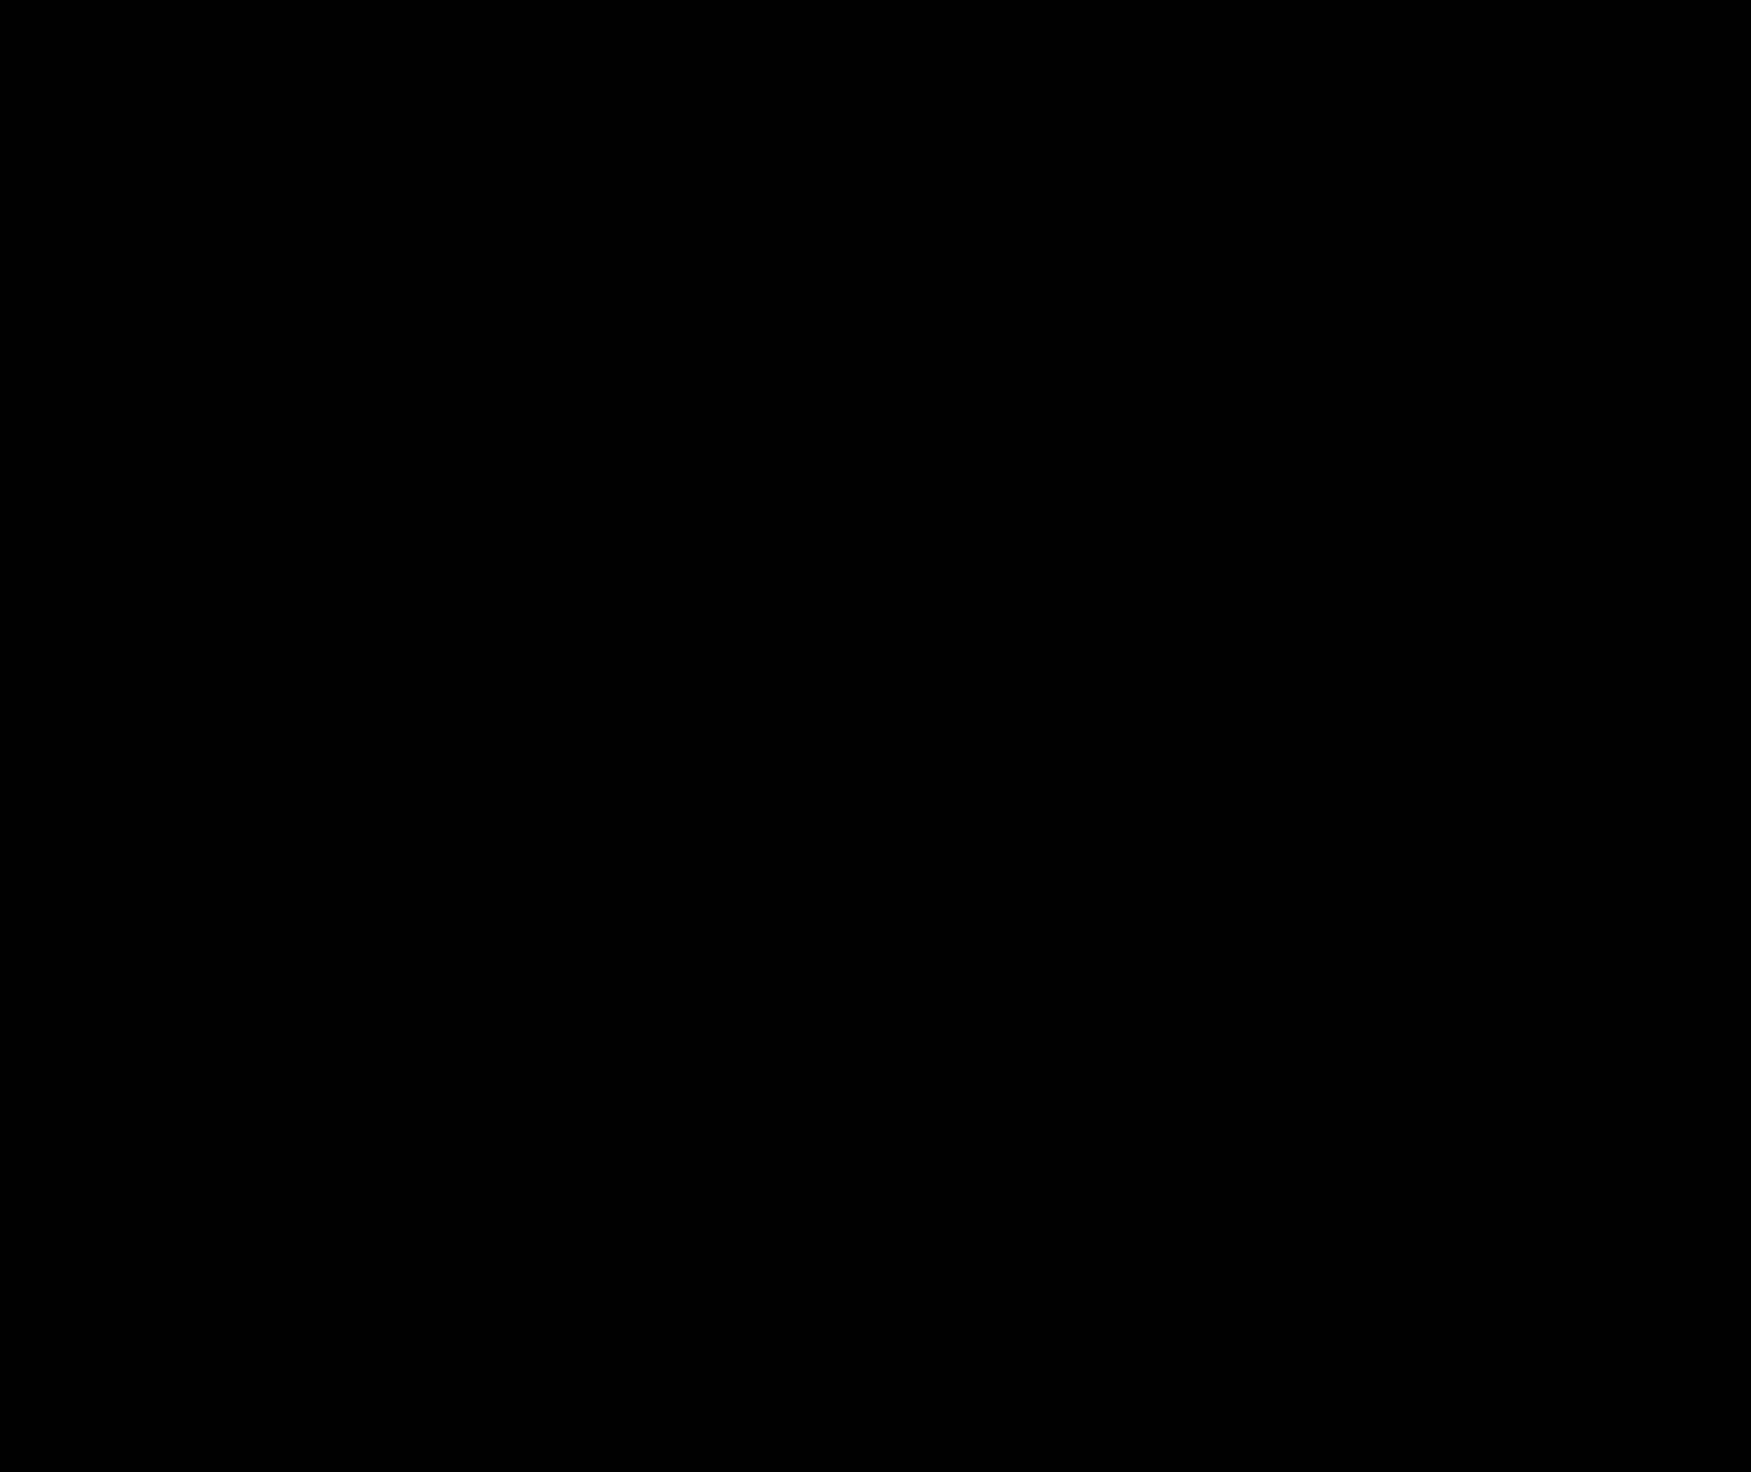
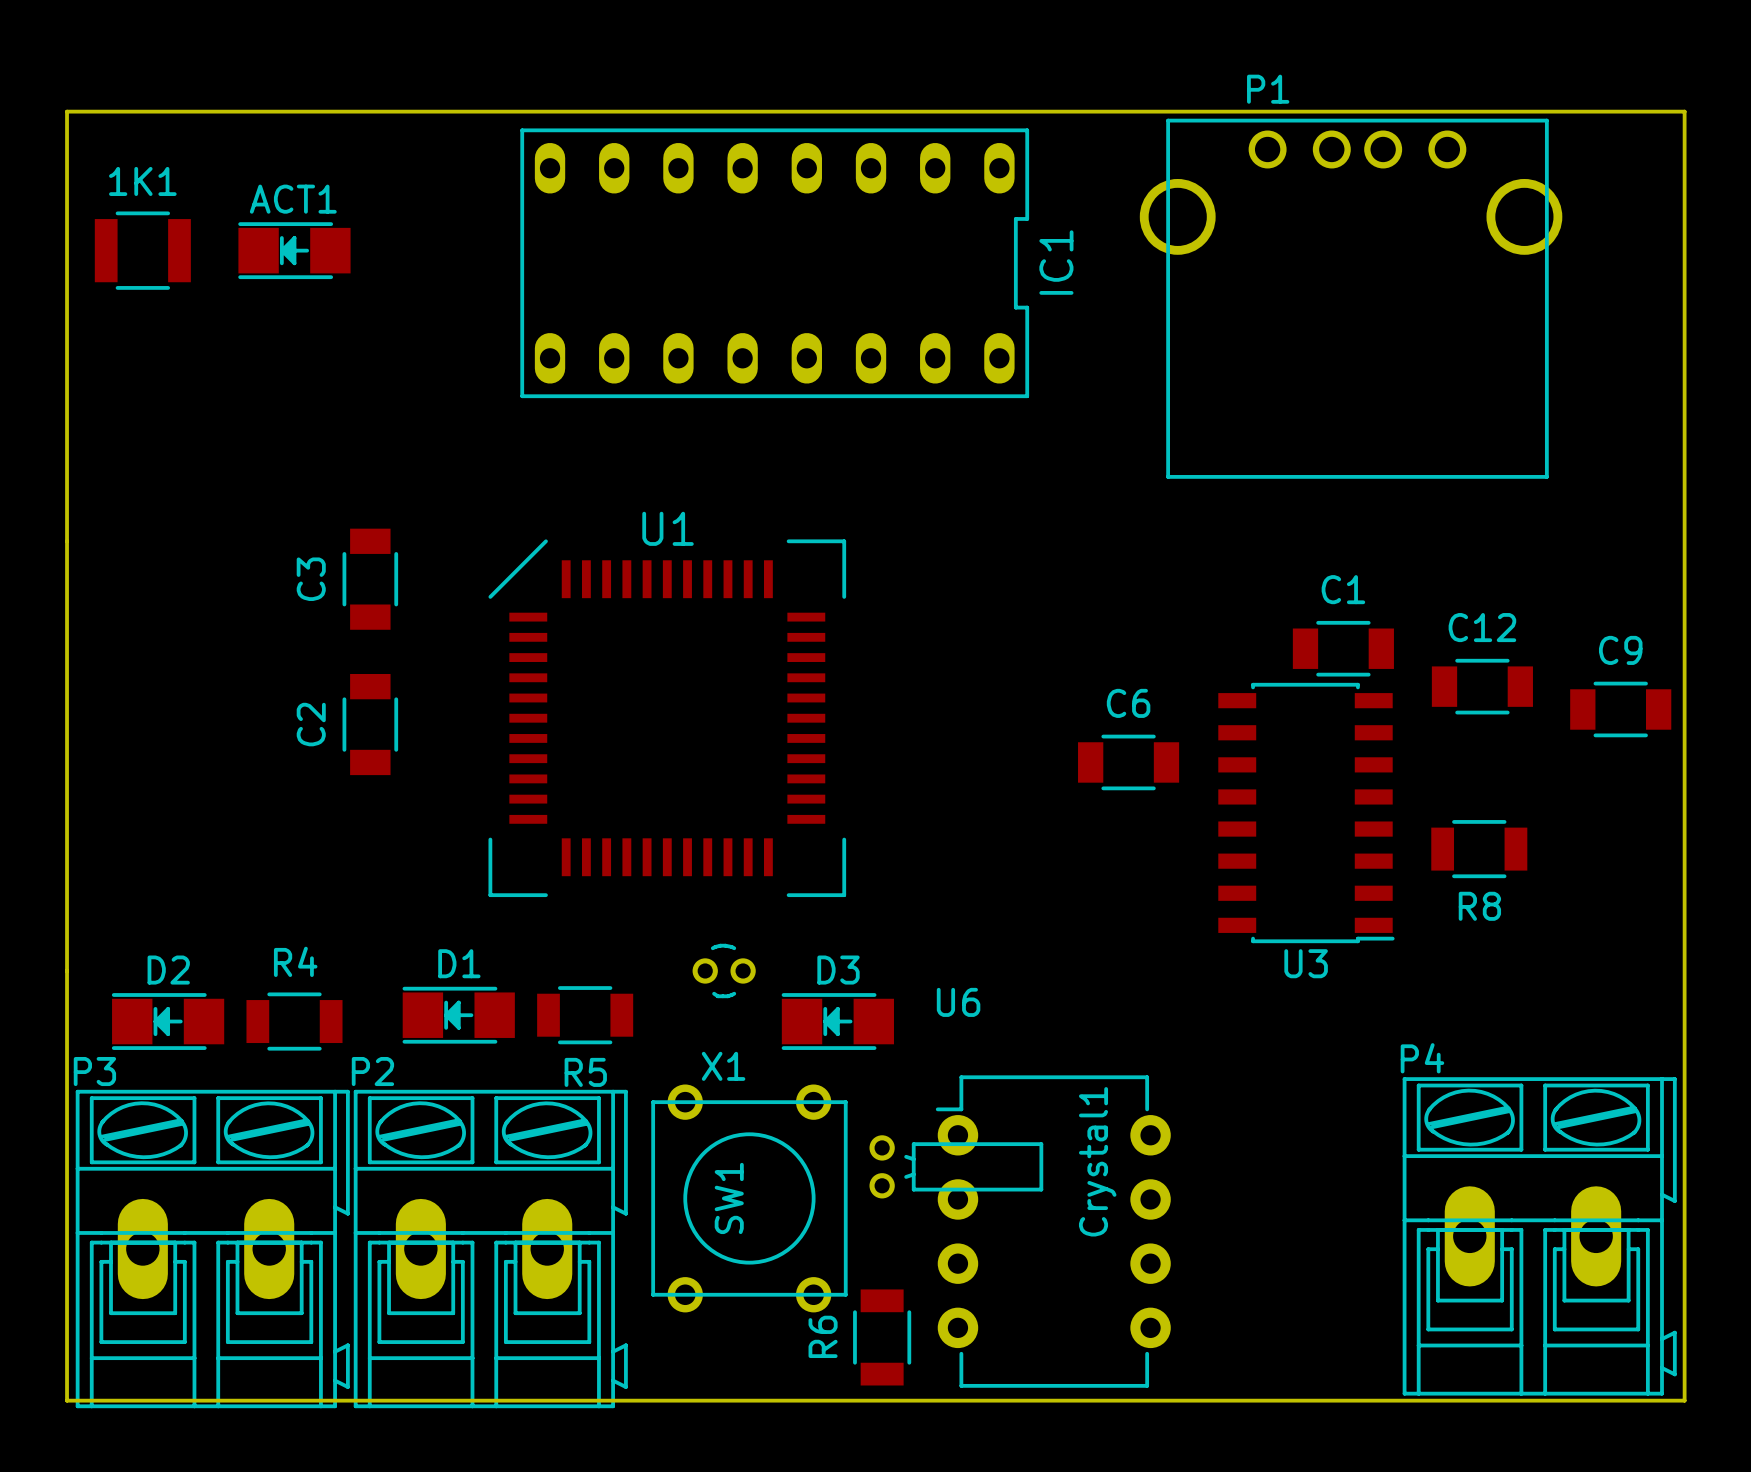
board edge: none -> (67, 111) (67, 1400) (1684, 1400) (1684, 111) (67, 111)
1K1: none -> (142, 250)
ACT1: none -> (294, 250)
IC1: none -> (774, 263)
P1: none -> (1351, 298)
C3: none -> (370, 579)
C1: none -> (1343, 648)
C12: none -> (1482, 686)
C9: none -> (1620, 709)
U1: none -> (667, 718)
C2: none -> (370, 724)
C6: none -> (1128, 762)
U3: none -> (1306, 813)
R8: none -> (1479, 849)
X1: none -> (724, 970)
D1: none -> (458, 1015)
R5: none -> (585, 1015)
D2: none -> (168, 1021)
R4: none -> (294, 1021)
D3: none -> (837, 1021)
Crystal1: none -> (956, 1166)
SW1: none -> (749, 1198)
U6: none -> (1053, 1231)
P4: none -> (1539, 1236)
P3: none -> (212, 1249)
P2: none -> (490, 1249)
R6: none -> (882, 1337)

